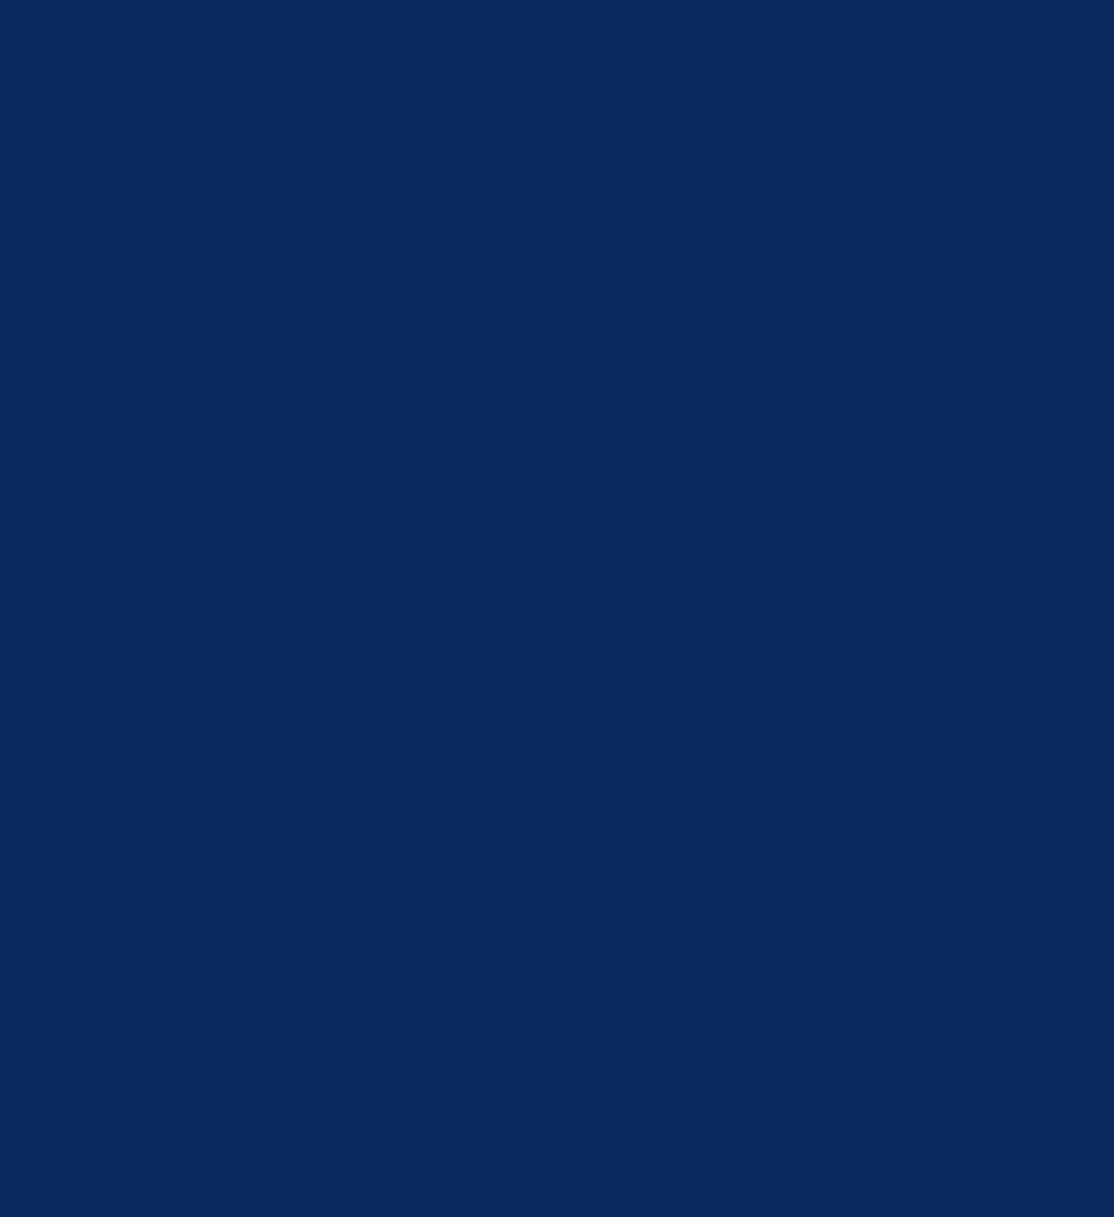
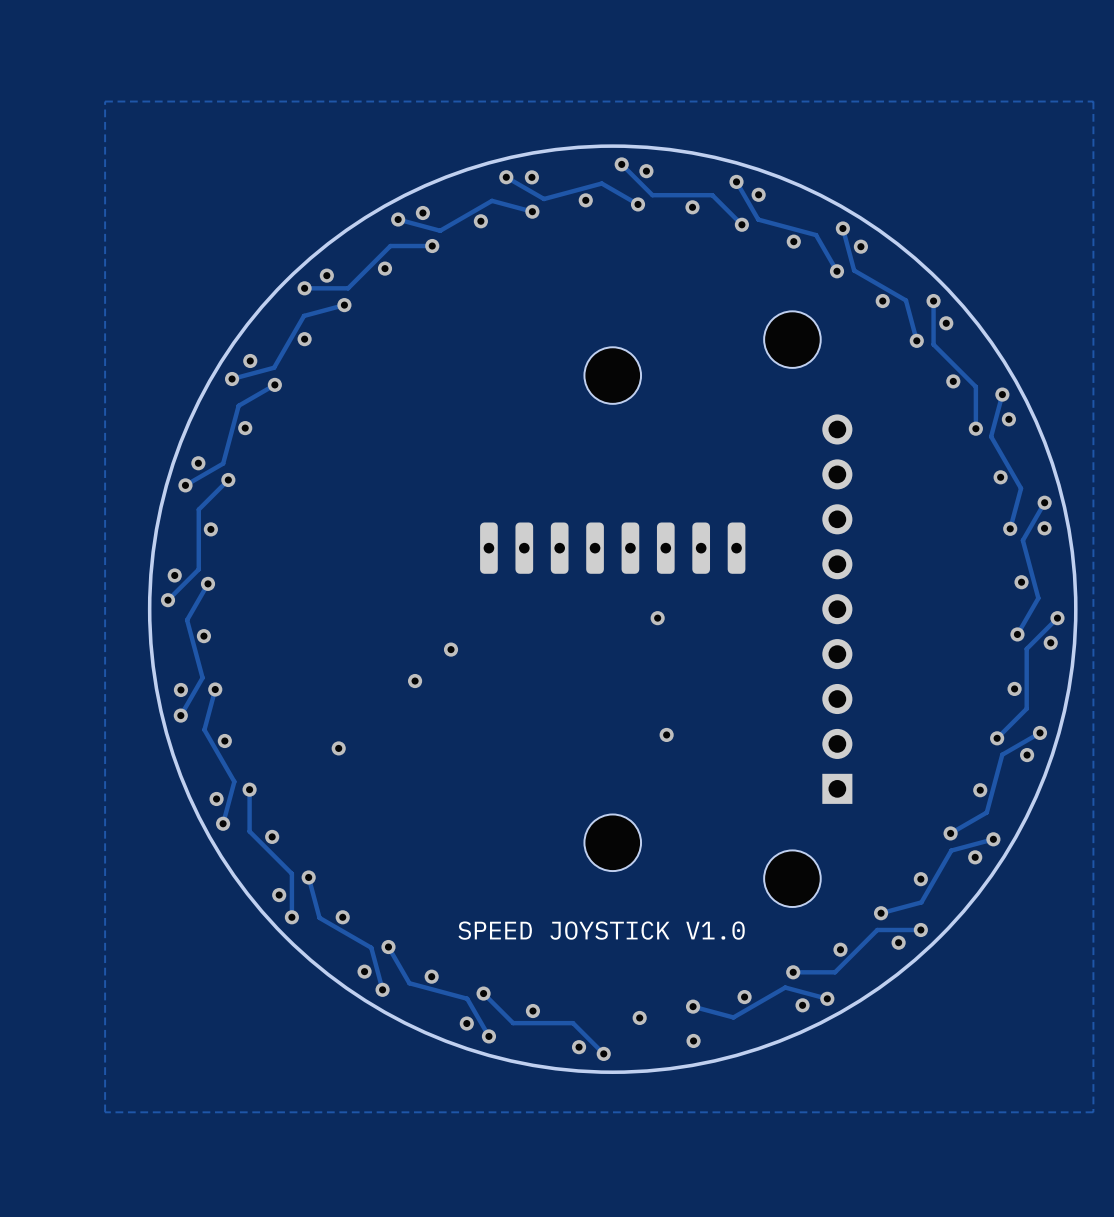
zone outline: none -> (1093, 101) (1093, 1112) (105, 1112) (105, 101) (1093, 101)
round board edge: none -> [147, 144, 1078, 1074]
track: none -> (621, 164) (652, 195) (712, 195) (741, 224)
via: none -> (621, 164)
via: none -> (646, 171)
track: none -> (506, 177) (544, 199) (601, 183) (638, 204)
via: none -> (506, 177)
via: none -> (531, 177)
track: none -> (736, 181) (758, 219) (816, 235) (836, 271)
via: none -> (736, 181)
via: none -> (758, 194)
via: none -> (585, 200)
via: none -> (638, 204)
via: none -> (692, 207)
track: none -> (532, 211) (492, 200) (440, 230) (398, 219)
via: none -> (532, 211)
via: none -> (422, 212)
via: none -> (398, 219)
via: none -> (480, 221)
via: none -> (741, 224)
track: none -> (842, 228) (854, 270) (905, 300) (916, 340)
via: none -> (842, 228)
via: none -> (793, 241)
track: none -> (432, 246) (390, 246) (348, 288) (304, 288)
via: none -> (432, 246)
via: none -> (860, 246)
via: none -> (384, 268)
via: none -> (836, 271)
via: none -> (326, 275)
via: none -> (304, 288)
via: none -> (882, 301)
track: none -> (933, 301) (933, 344) (975, 386) (975, 428)
via: none -> (933, 301)
track: none -> (344, 305) (304, 315) (274, 367) (232, 379)
via: none -> (344, 305)
via: none -> (946, 323)
via: none -> (304, 339)
part: none -> (792, 339)
via: none -> (916, 340)
via: none -> (250, 360)
part: none -> (612, 375)
via: none -> (232, 379)
via: none -> (953, 381)
track: none -> (274, 384) (238, 405) (223, 463) (185, 485)
via: none -> (274, 384)
track: none -> (1002, 394) (991, 436) (1021, 488) (1010, 528)
via: none -> (1002, 394)
via: none -> (1008, 419)
via: none -> (245, 428)
via: none -> (975, 428)
via: none -> (198, 463)
via: none -> (1000, 477)
track: none -> (228, 479) (198, 509) (198, 569) (167, 600)
via: none -> (228, 479)
via: none -> (185, 485)
track: none -> (1044, 502) (1022, 540) (1038, 598) (1017, 634)
via: none -> (1044, 502)
via: none -> (1010, 528)
via: none -> (1044, 528)
via: none -> (210, 529)
part: none -> (612, 548)
via: none -> (174, 575)
via: none -> (1021, 582)
track: none -> (208, 583) (187, 620) (202, 677) (180, 715)
via: none -> (208, 583)
via: none -> (167, 600)
part: none -> (837, 609)
via: none -> (657, 618)
track: none -> (1057, 618) (1026, 648) (1026, 708) (997, 738)
via: none -> (1057, 618)
via: none -> (1017, 634)
via: none -> (203, 636)
via: none -> (1050, 642)
via: none -> (451, 649)
via: none -> (415, 681)
via: none -> (1014, 688)
via: none -> (180, 689)
track: none -> (215, 689) (204, 729) (234, 781) (223, 823)
via: none -> (215, 689)
via: none -> (180, 715)
track: none -> (1040, 732) (1002, 754) (986, 812) (950, 833)
via: none -> (1040, 732)
via: none -> (666, 734)
via: none -> (997, 738)
via: none -> (224, 741)
via: none -> (338, 748)
via: none -> (1027, 755)
track: none -> (249, 789) (249, 831) (291, 873) (291, 917)
via: none -> (249, 789)
via: none -> (980, 790)
via: none -> (216, 798)
via: none -> (223, 823)
via: none -> (950, 833)
via: none -> (272, 836)
track: none -> (993, 839) (951, 850) (921, 902) (881, 913)
via: none -> (993, 839)
part: none -> (612, 842)
via: none -> (975, 857)
track: none -> (308, 877) (319, 917) (371, 947) (382, 989)
via: none -> (308, 877)
part: none -> (792, 878)
via: none -> (920, 879)
via: none -> (279, 895)
via: none -> (881, 913)
via: none -> (291, 917)
via: none -> (342, 917)
text: none -> SPEED JOYSTICK V1.0 (601, 930)
track: none -> (920, 930) (877, 930) (835, 972) (793, 972)
via: none -> (920, 930)
via: none -> (898, 942)
track: none -> (388, 947) (409, 983) (467, 998) (488, 1036)
via: none -> (388, 947)
via: none -> (840, 949)
via: none -> (364, 971)
via: none -> (793, 972)
via: none -> (431, 976)
via: none -> (382, 989)
track: none -> (483, 993) (513, 1023) (572, 1023) (603, 1053)
via: none -> (483, 993)
via: none -> (744, 997)
track: none -> (827, 998) (785, 987) (733, 1017) (693, 1006)
via: none -> (827, 998)
via: none -> (802, 1005)
via: none -> (693, 1006)
via: none -> (532, 1011)
via: none -> (639, 1017)
via: none -> (466, 1023)
via: none -> (488, 1036)
via: none -> (693, 1040)
via: none -> (579, 1047)
via: none -> (603, 1053)

